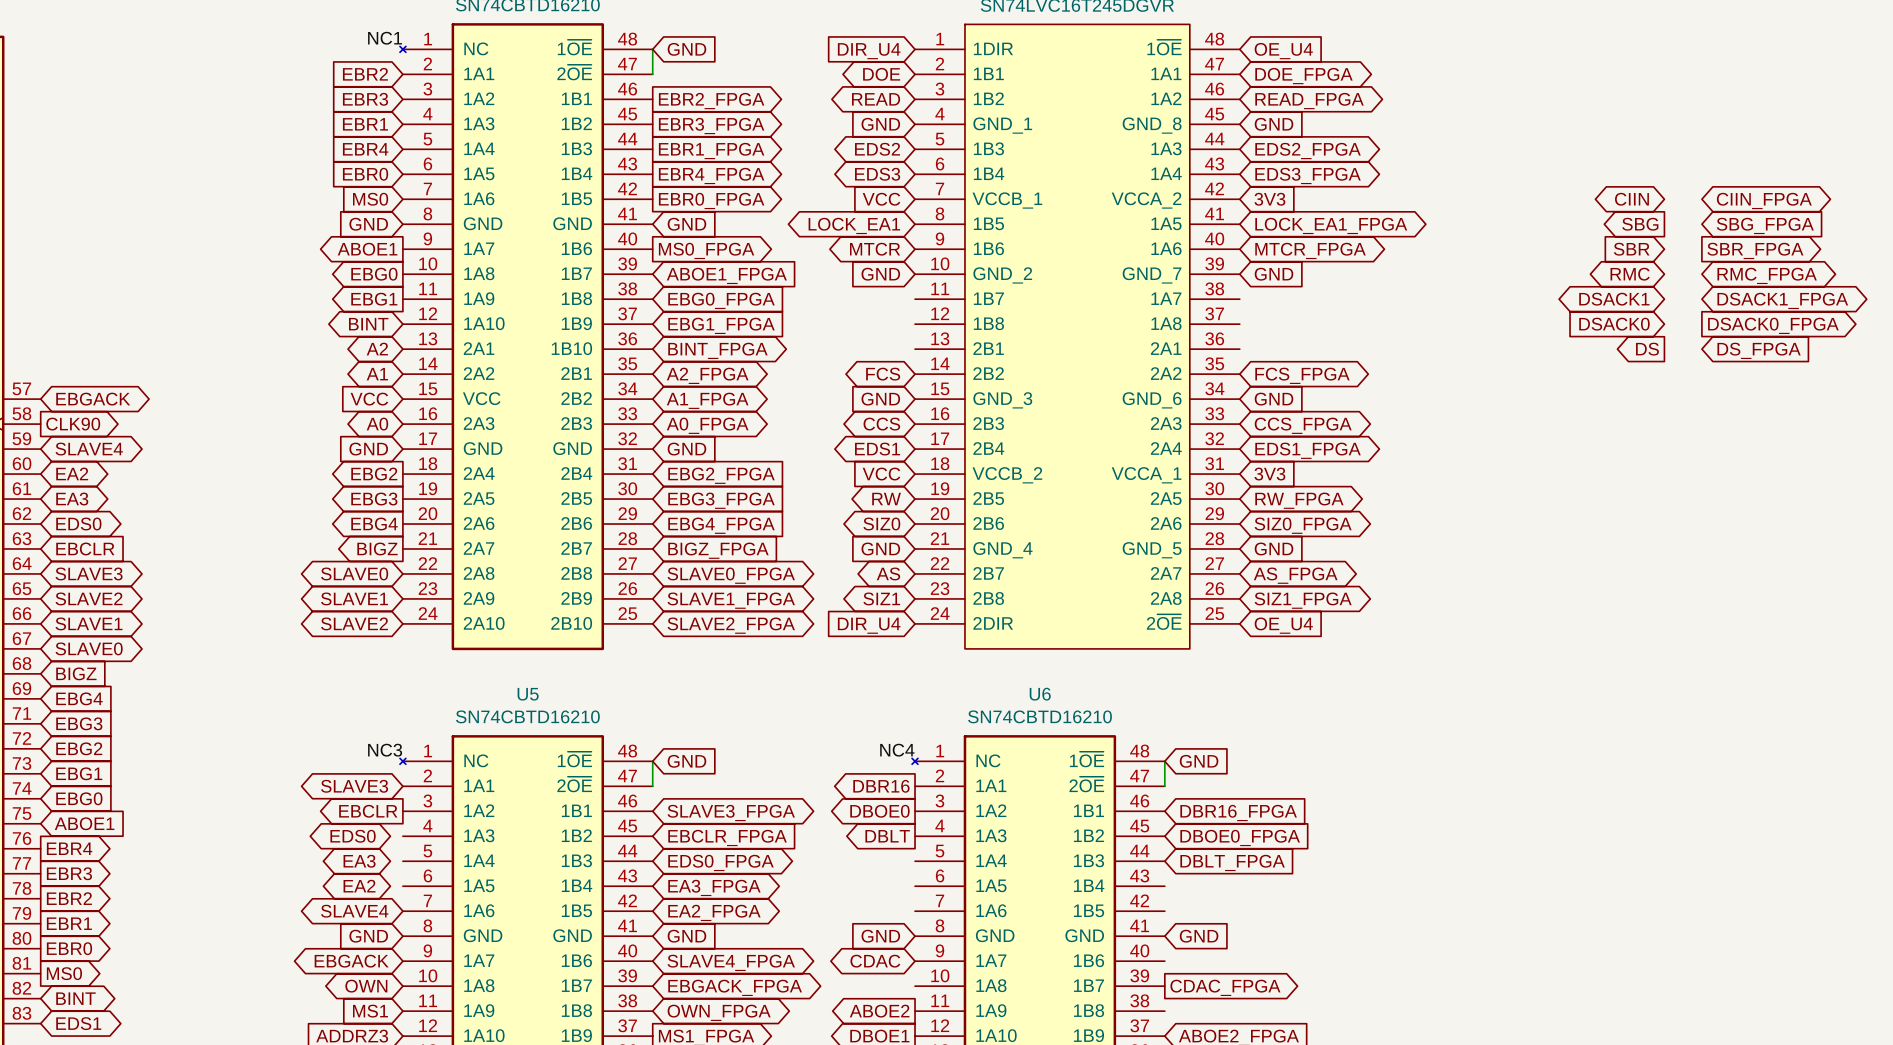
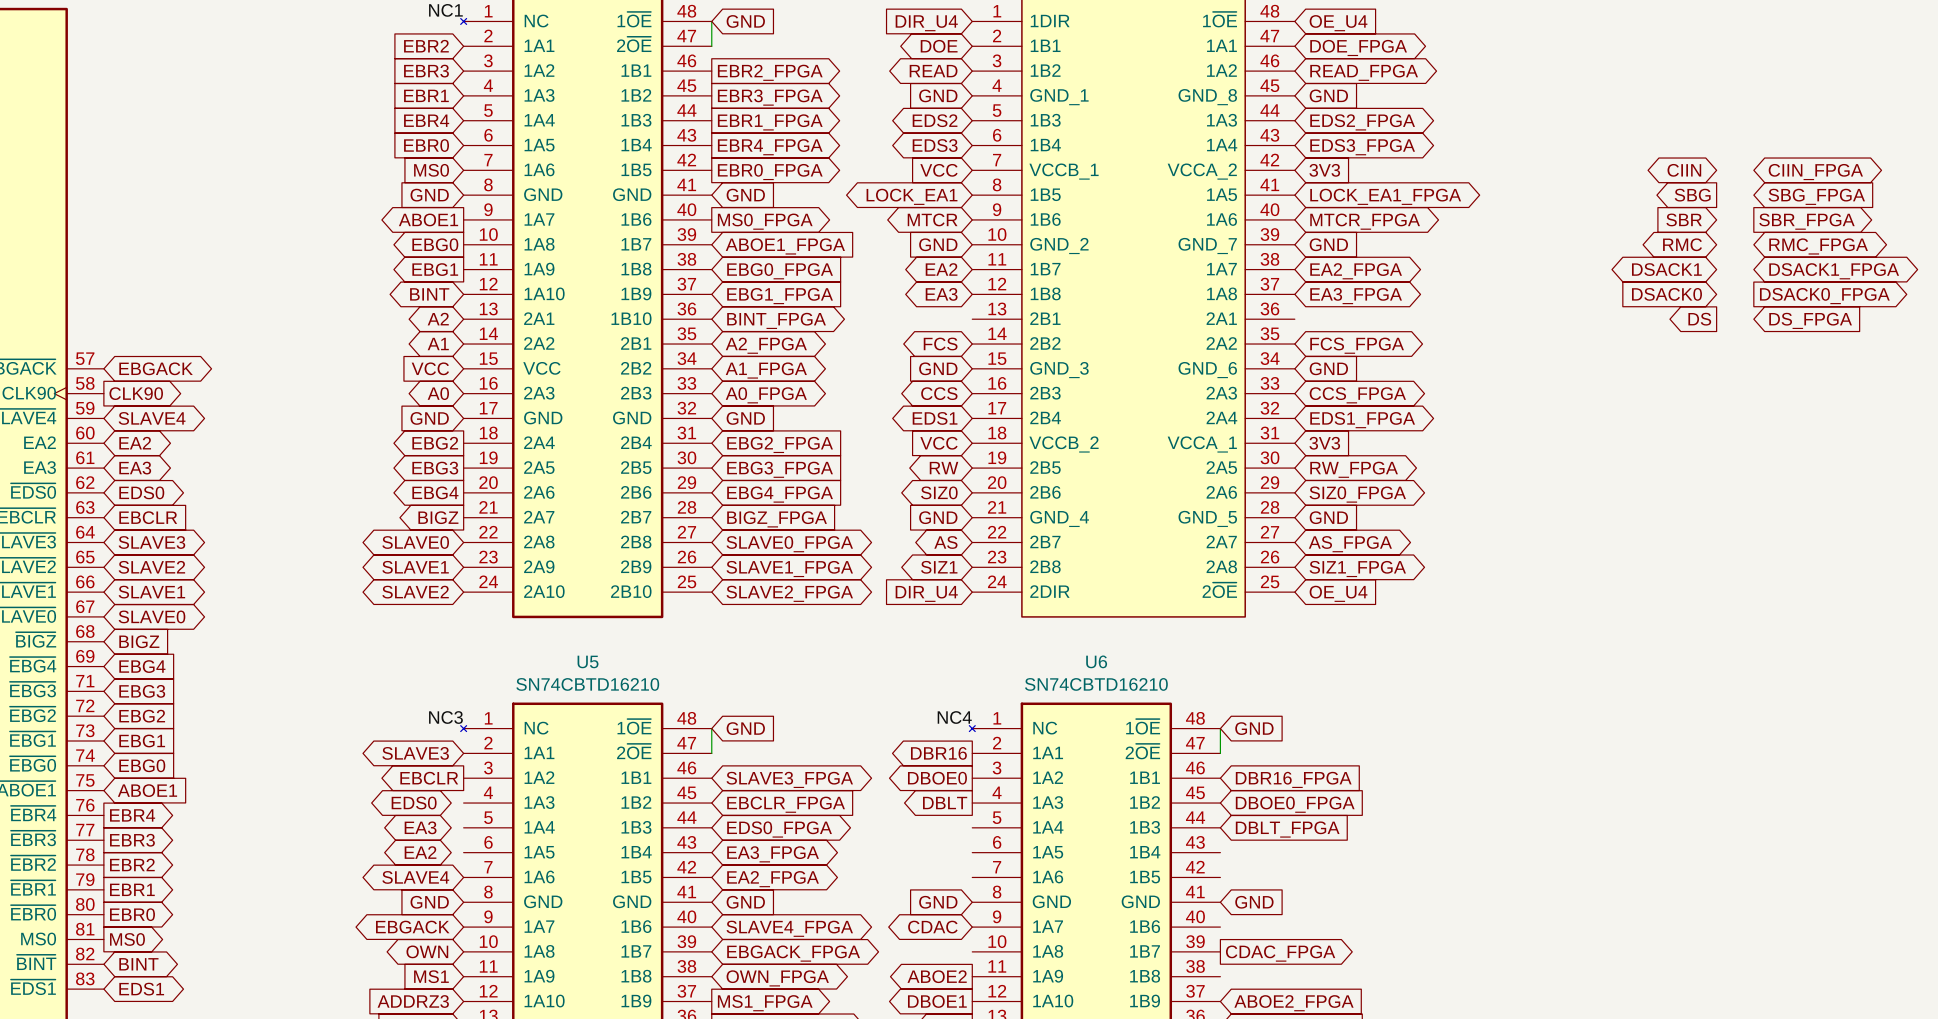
global label: none -> EA2 (941, 269)
global label: none -> EA2_FPGA (1356, 271)
global label: none -> EA3 (941, 294)
global label: none -> EA3_FPGA (1356, 296)

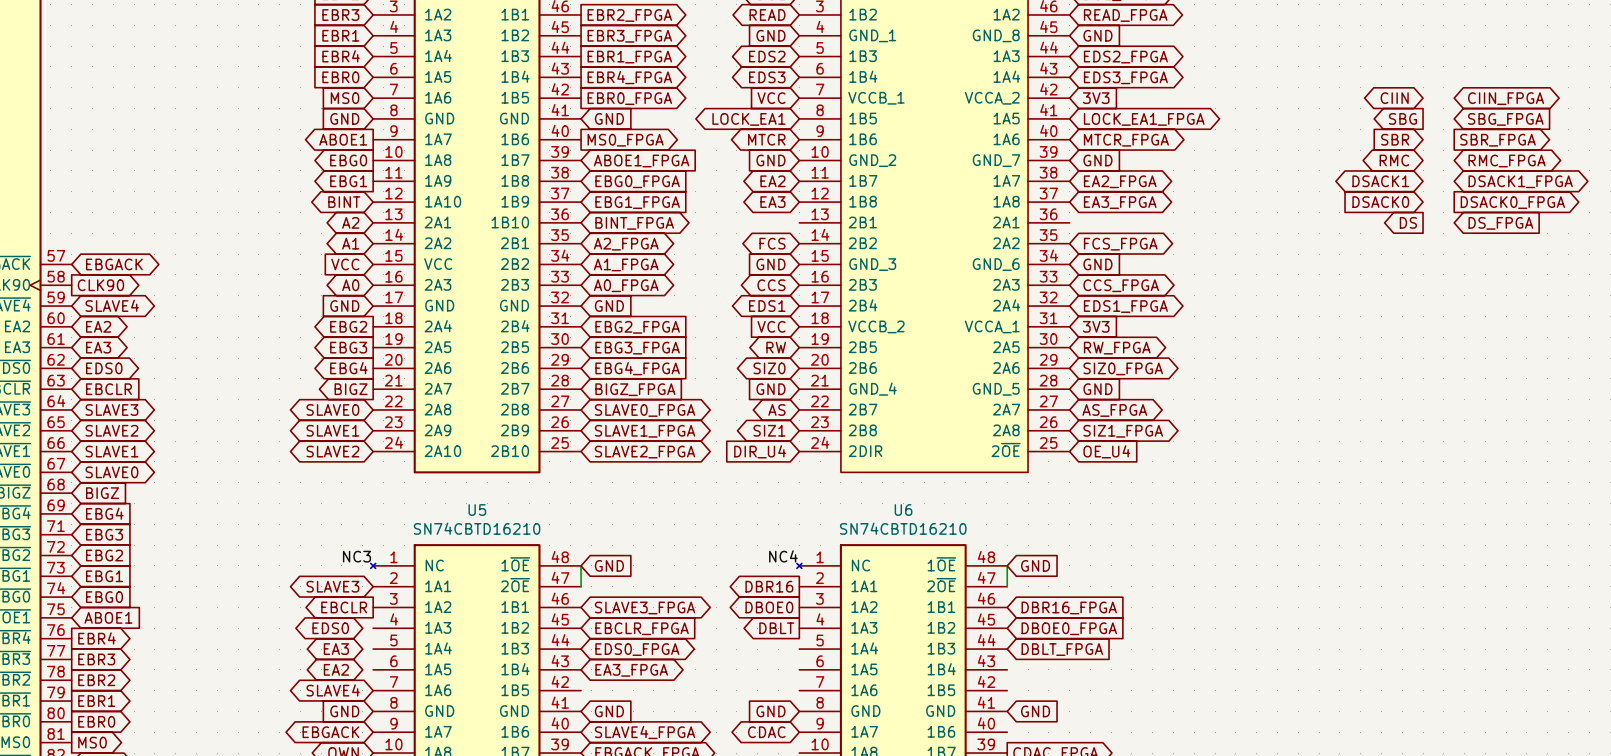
global label: EA2_FPGA (773, 879) -> none

